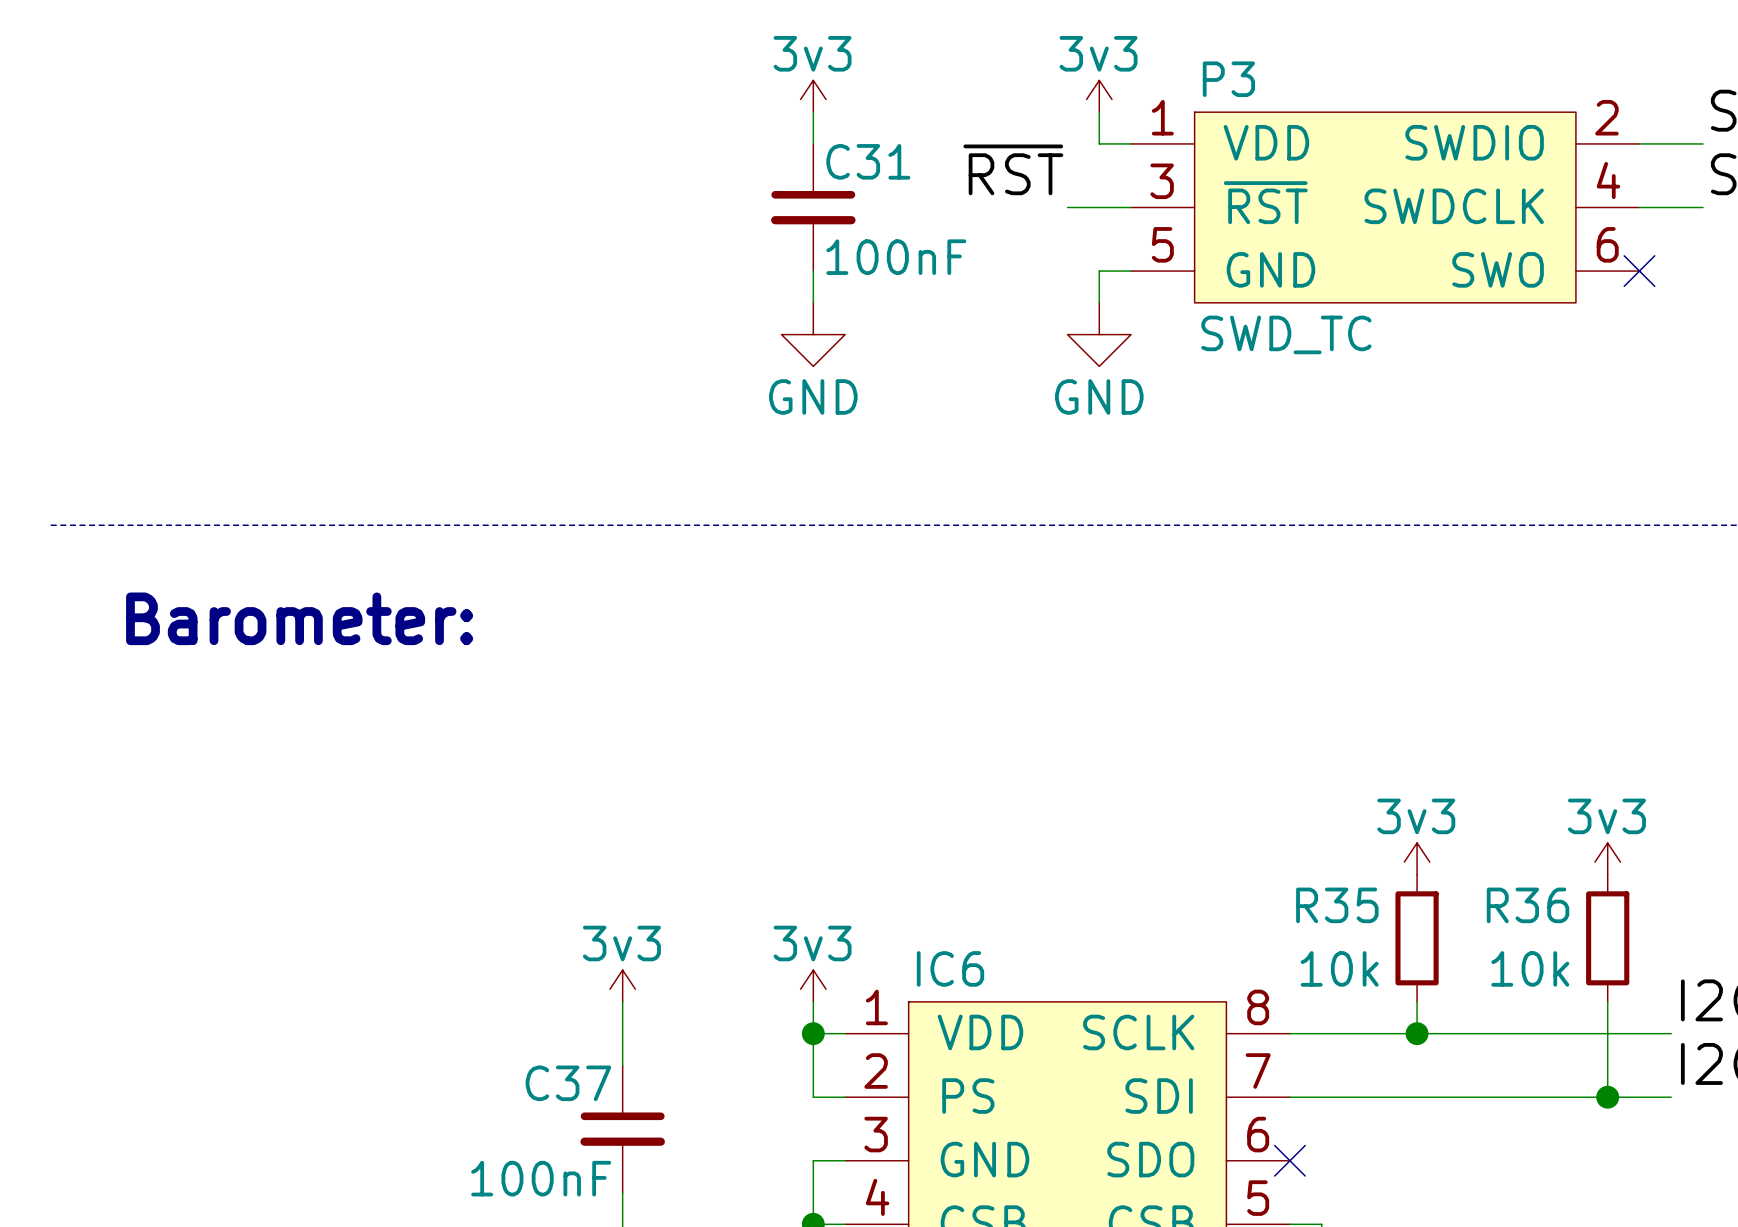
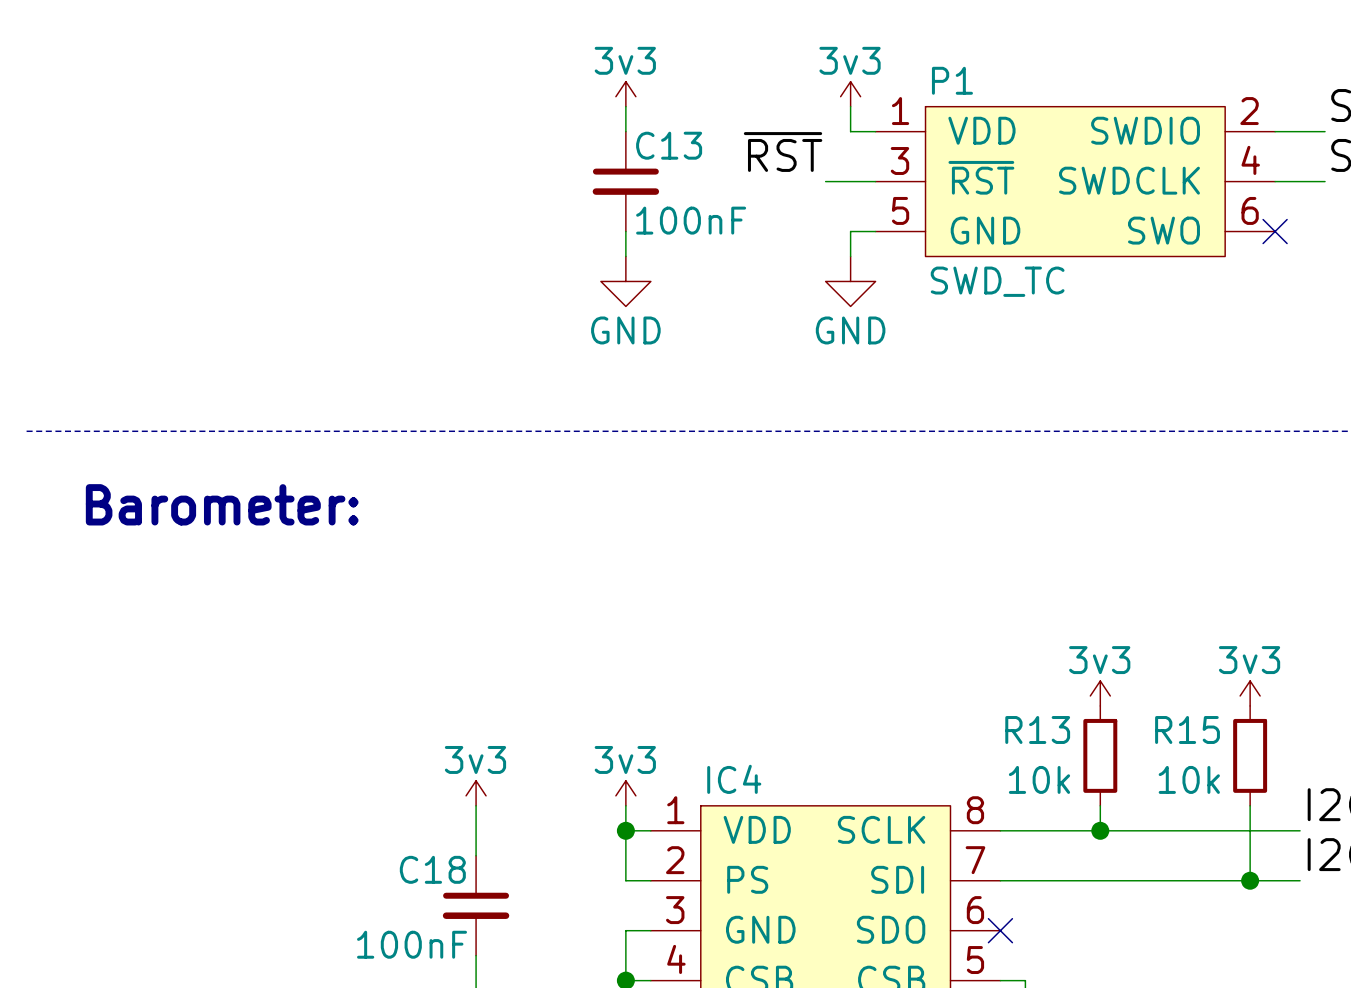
P3 name: P3 (1228, 79) -> P1 (952, 80)
C31 name: C31 (868, 161) -> C13 (669, 145)
R35 name: R35 (1337, 905) -> R13 (1037, 729)
R36 name: R36 (1528, 905) -> R15 (1187, 729)
IC6 name: IC6 (950, 968) -> IC4 (734, 779)
C37 name: C37 (568, 1083) -> C18 (432, 869)

